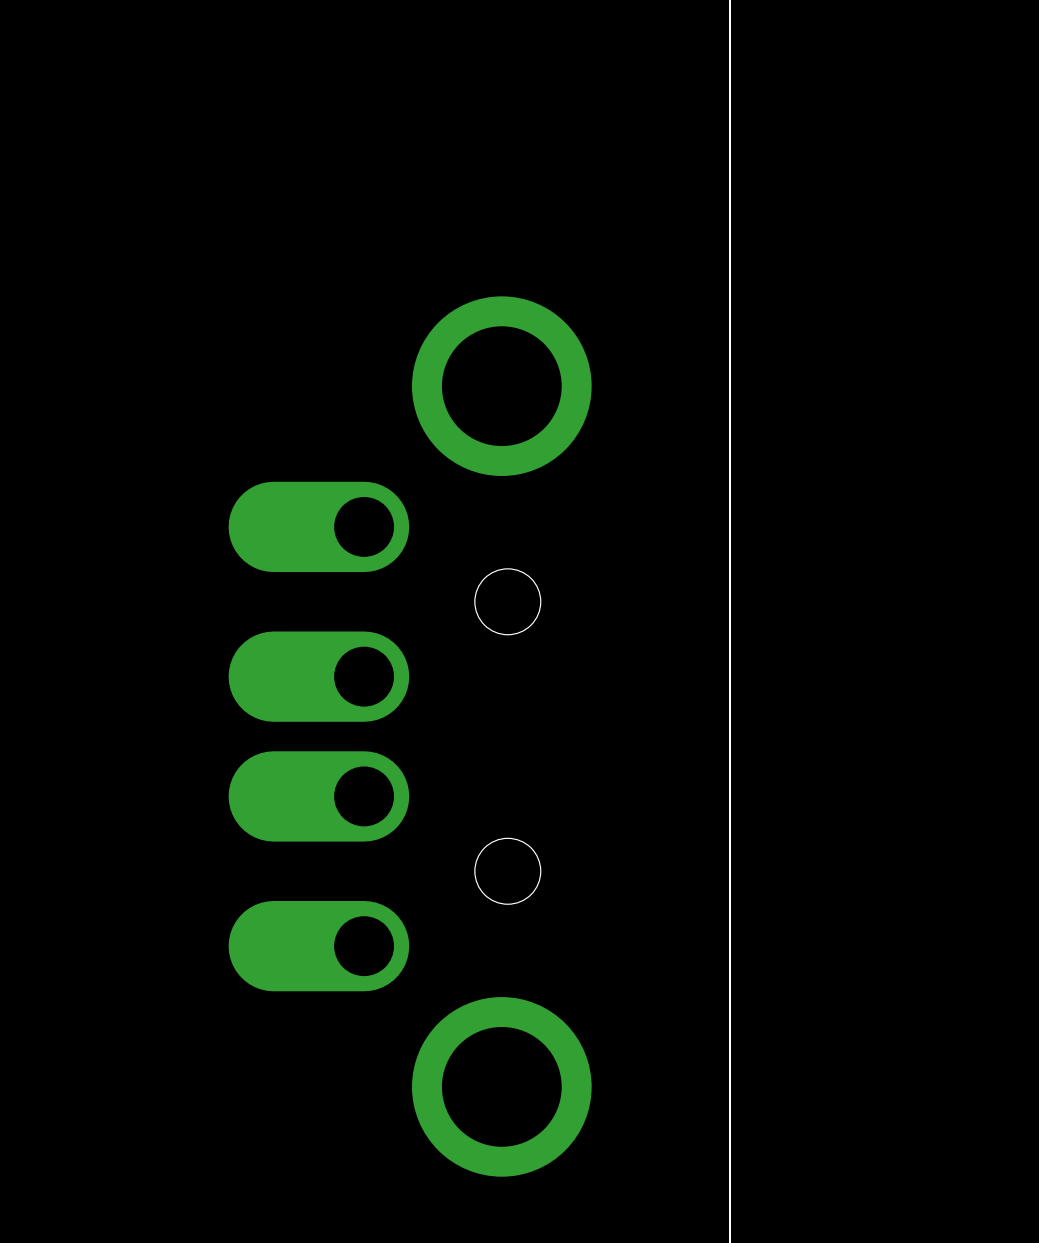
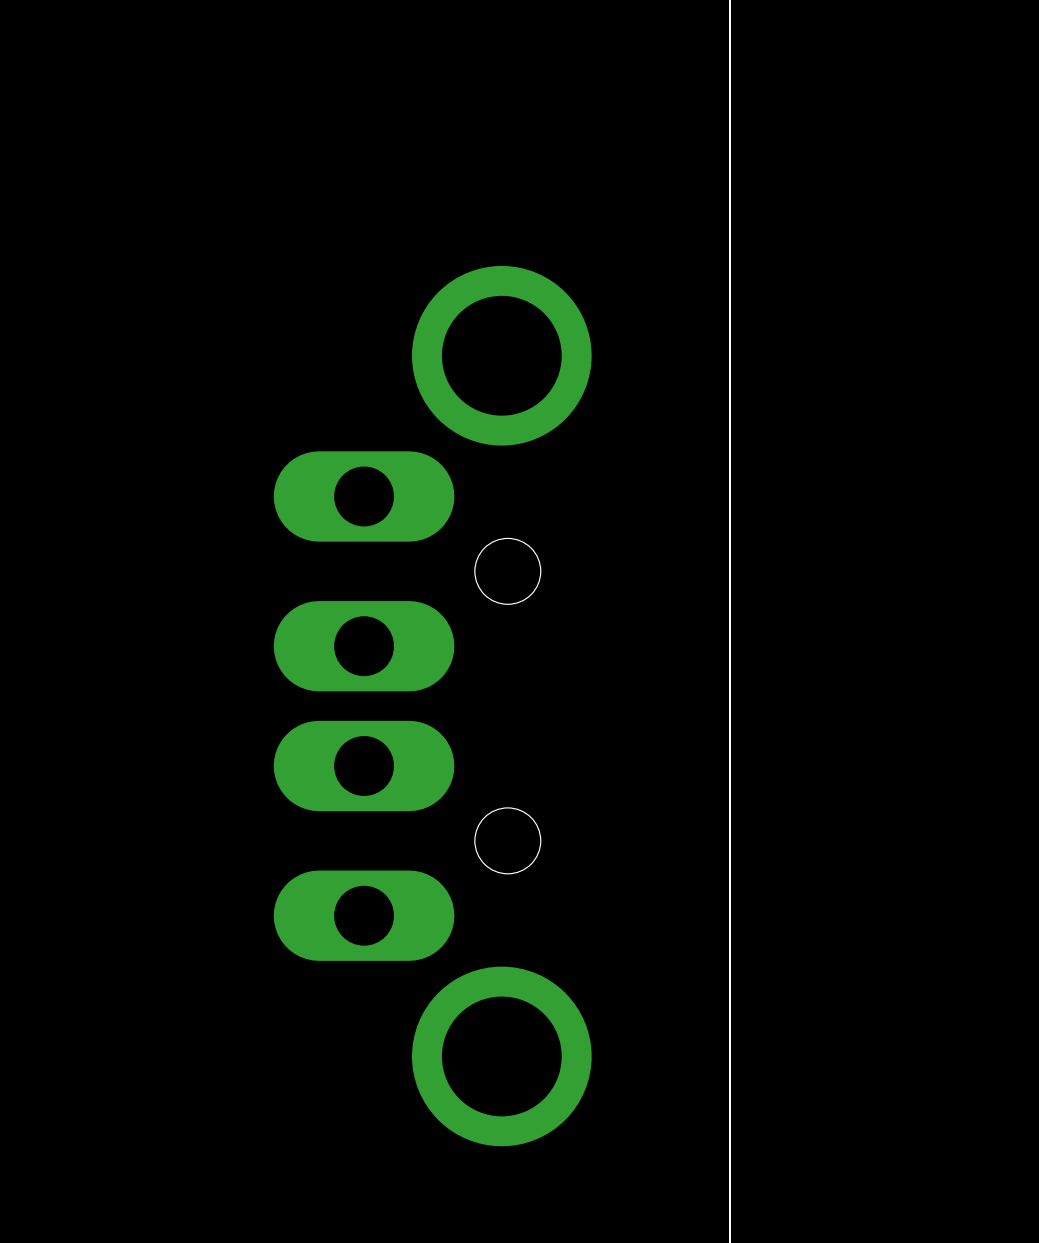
part footprint: [228, 296, 592, 1177] -> [273, 265, 592, 1147]

